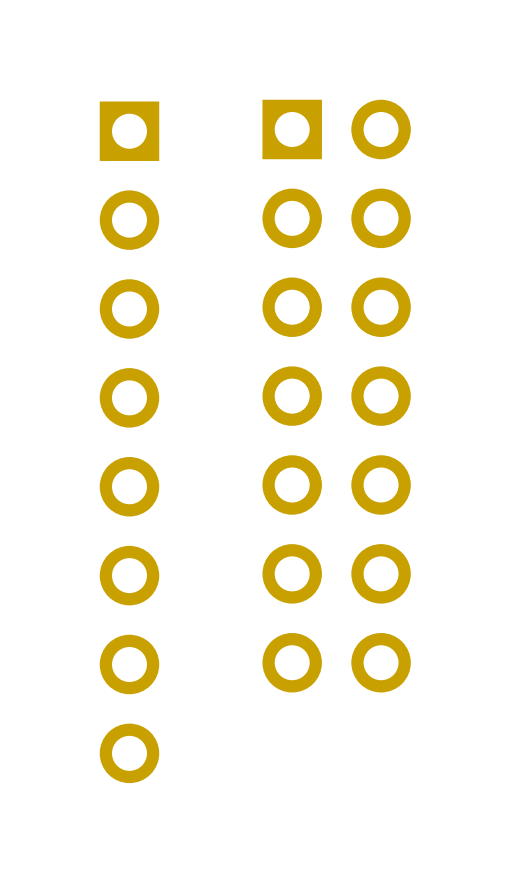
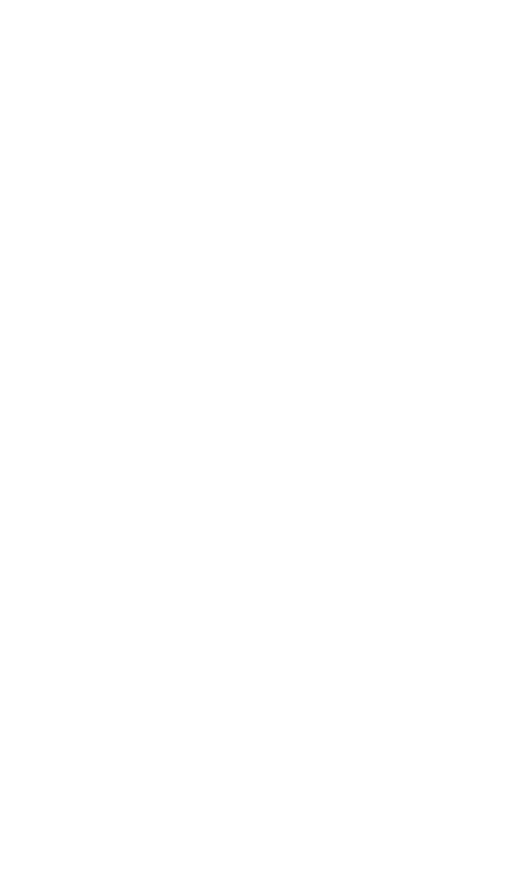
part: (336, 396) -> none
part: (129, 442) -> none

